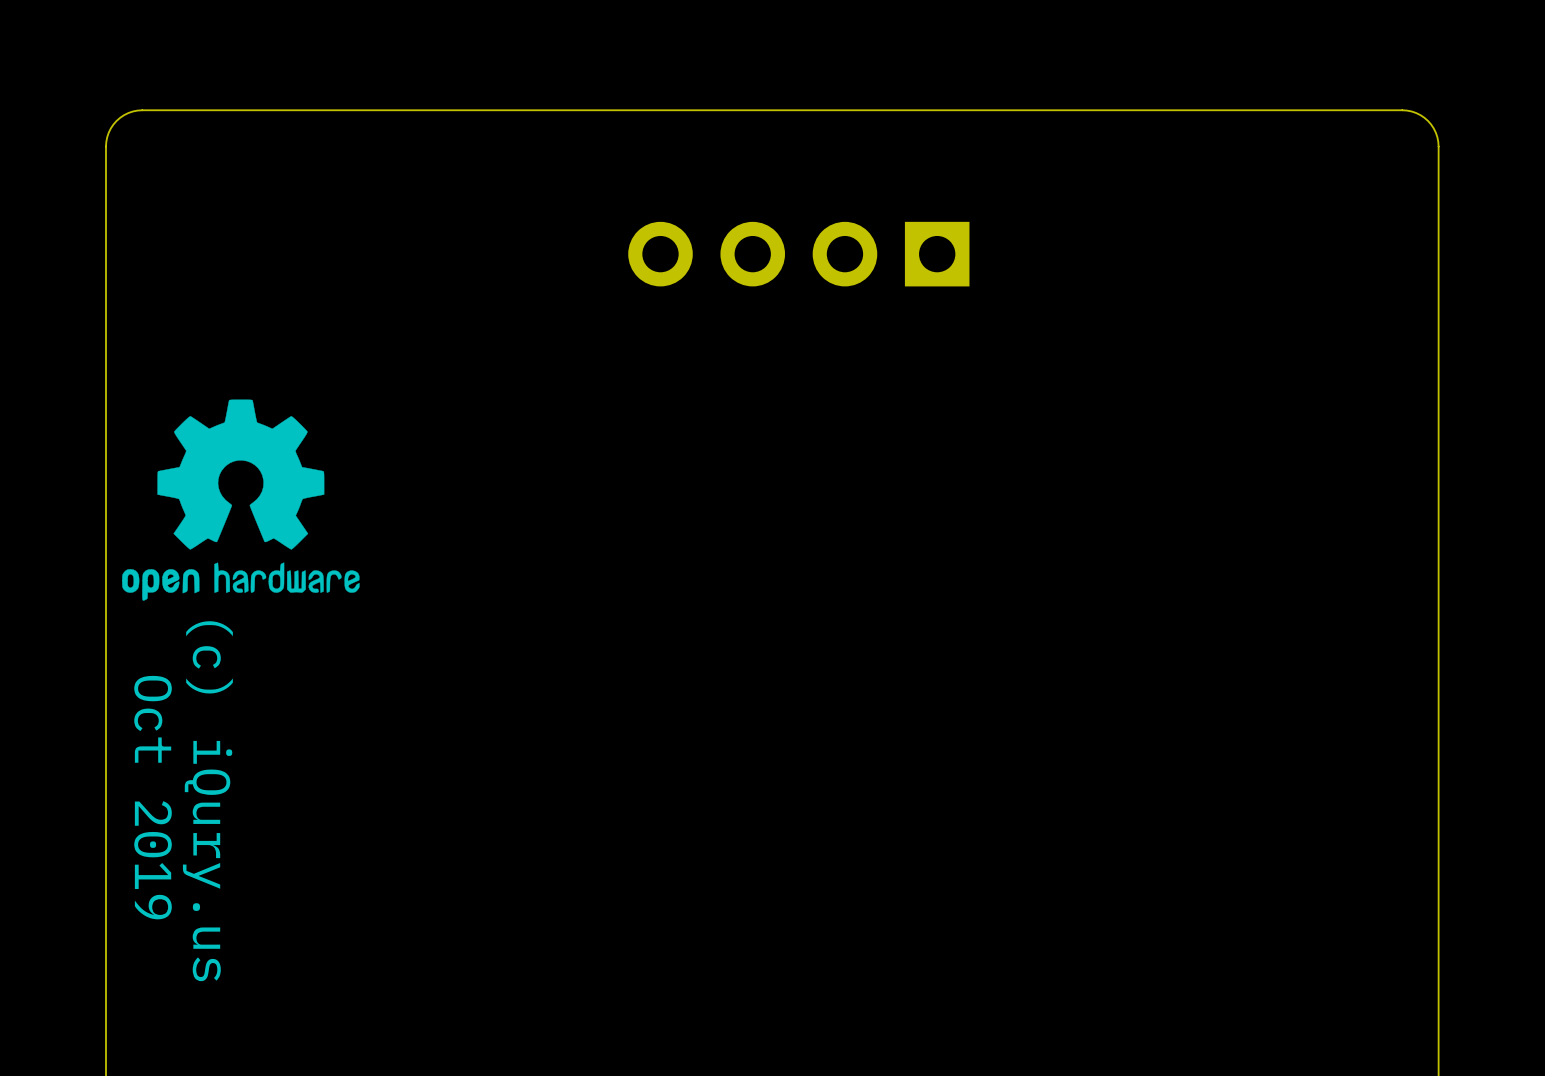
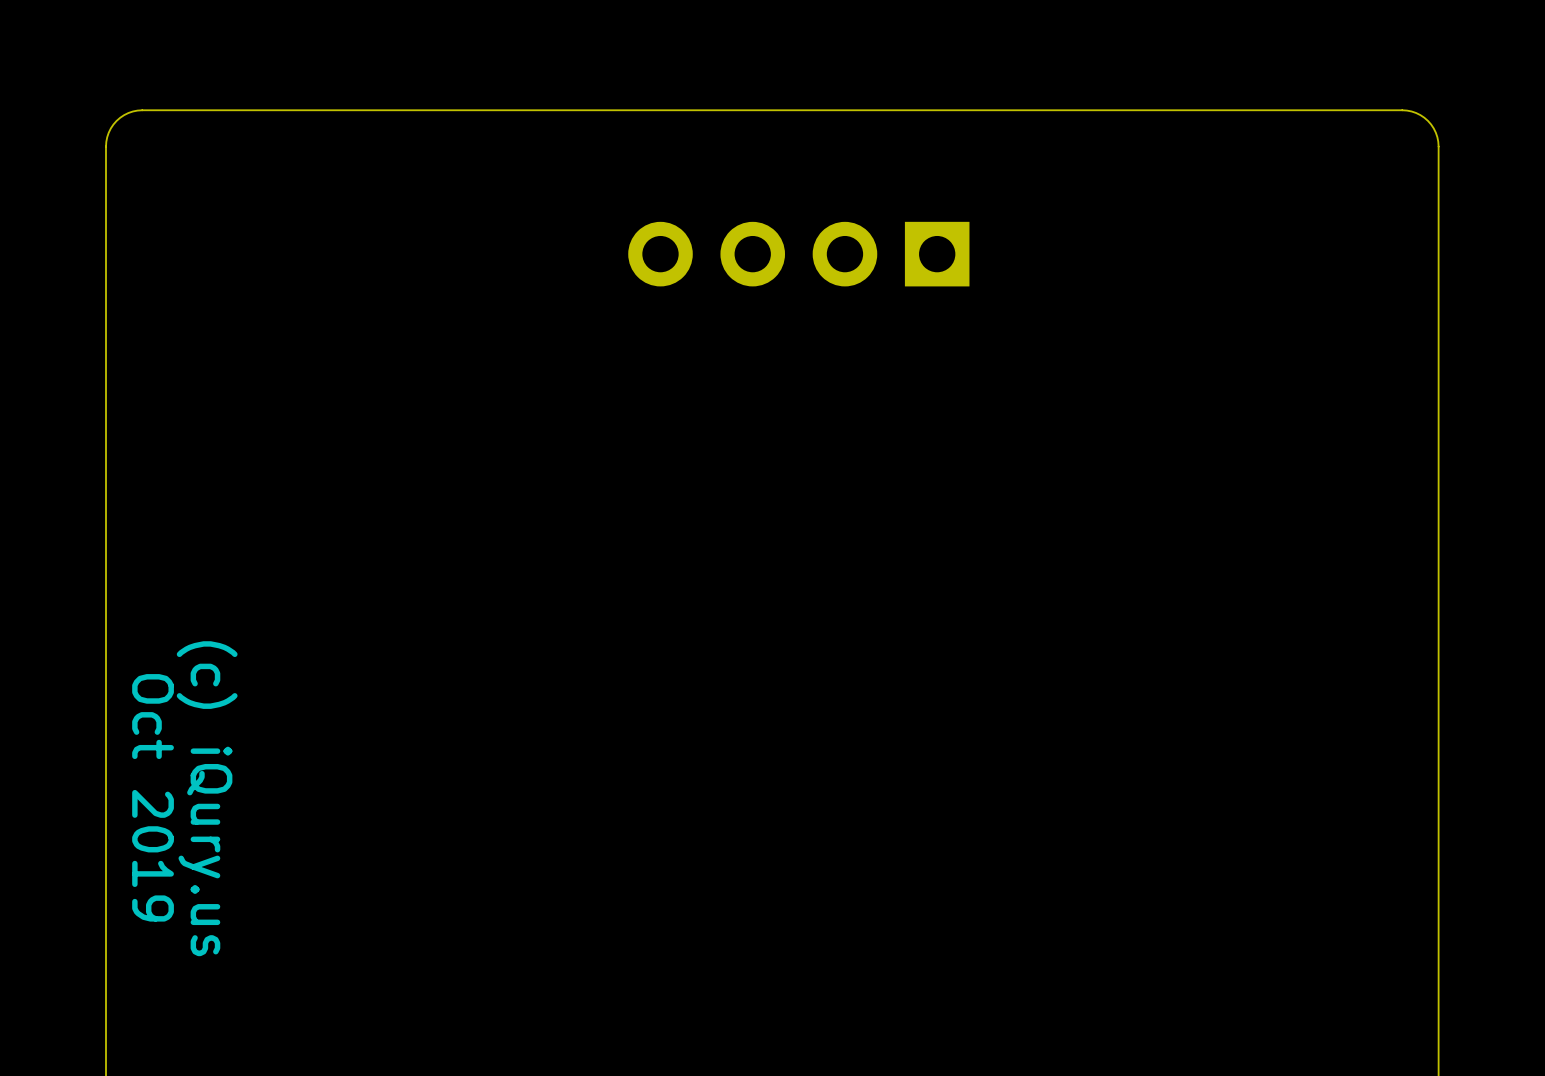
drawing: [122, 399, 360, 601] -> none

